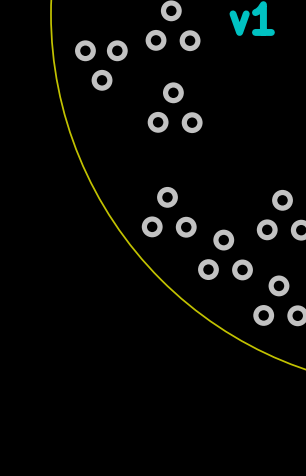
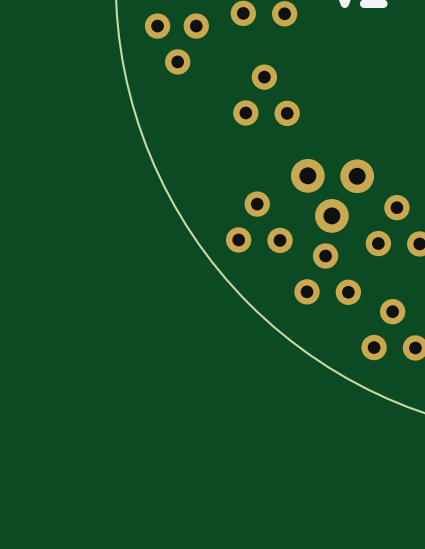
via: none -> (307, 175)
via: none -> (357, 176)
via: none -> (331, 215)

